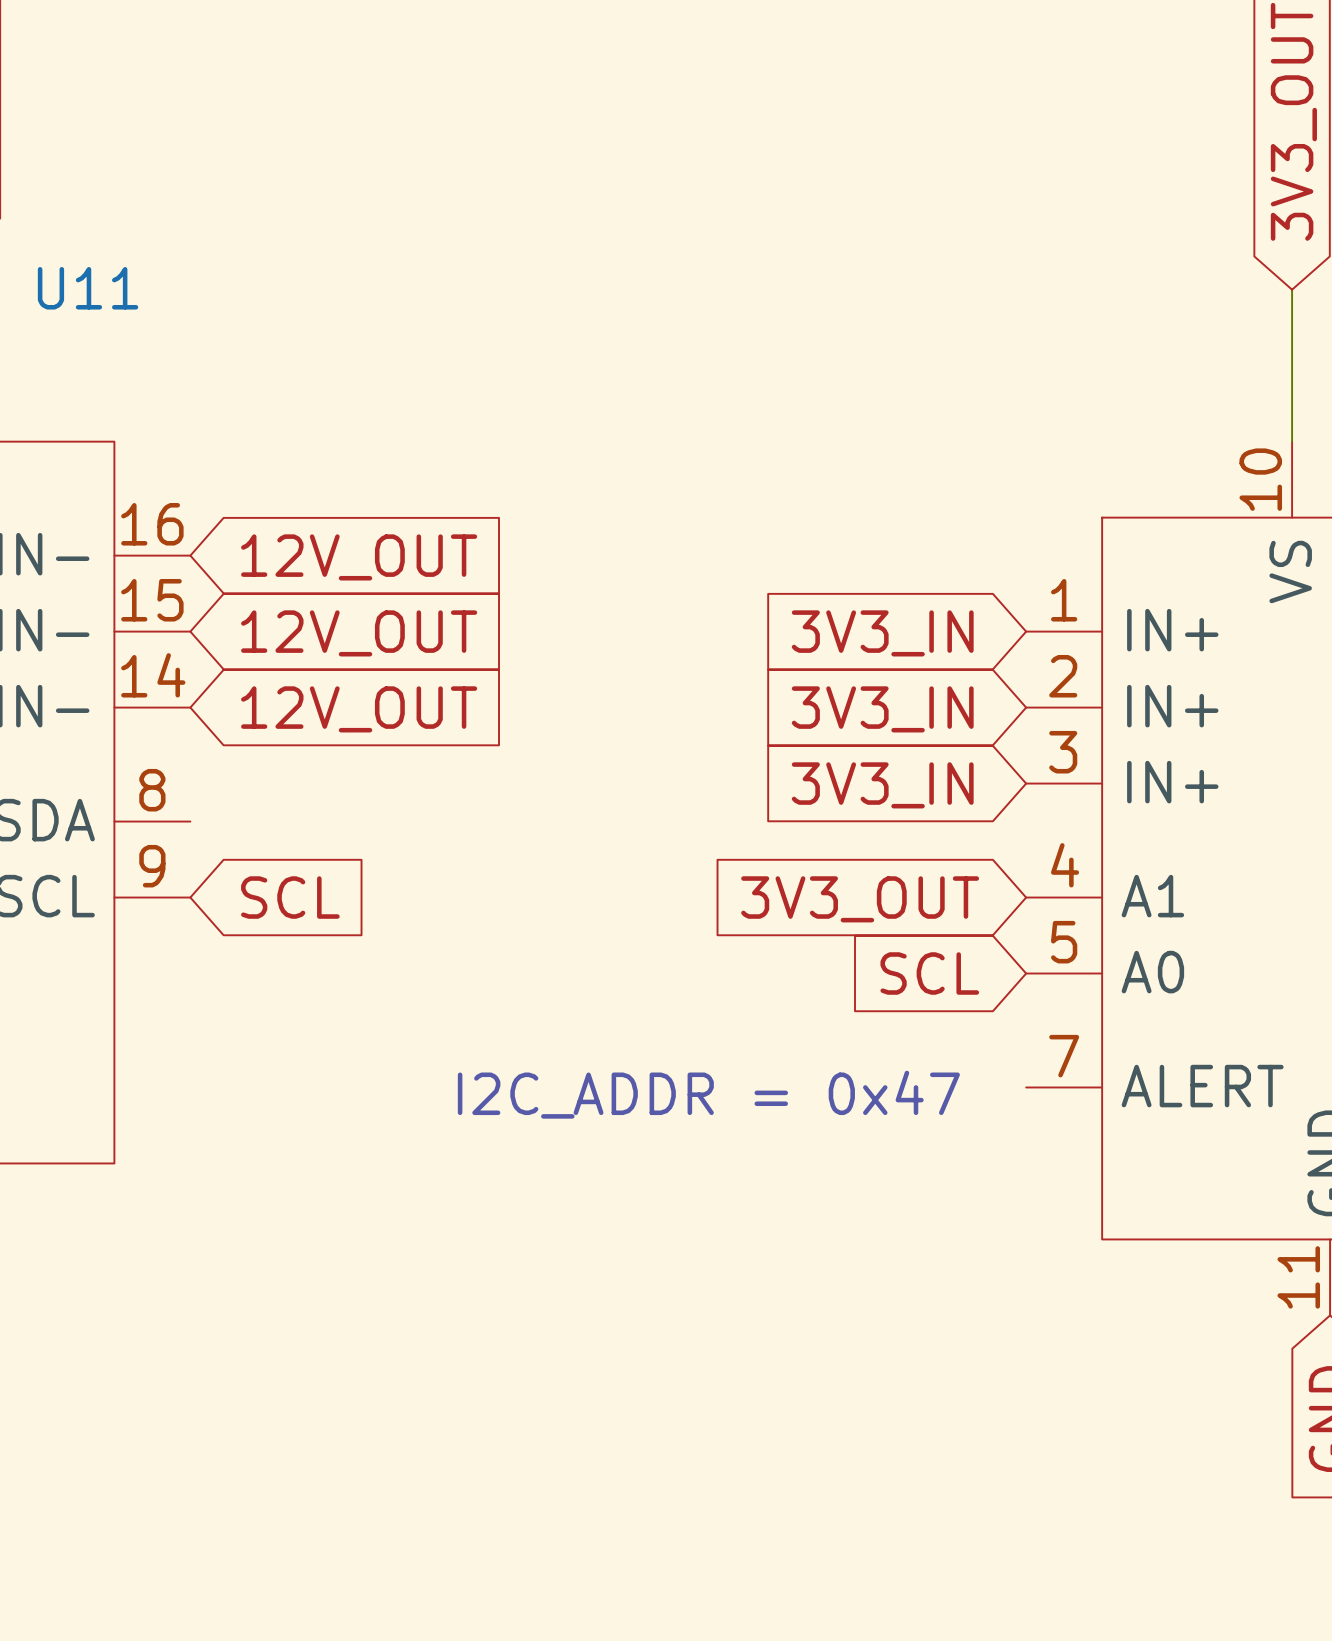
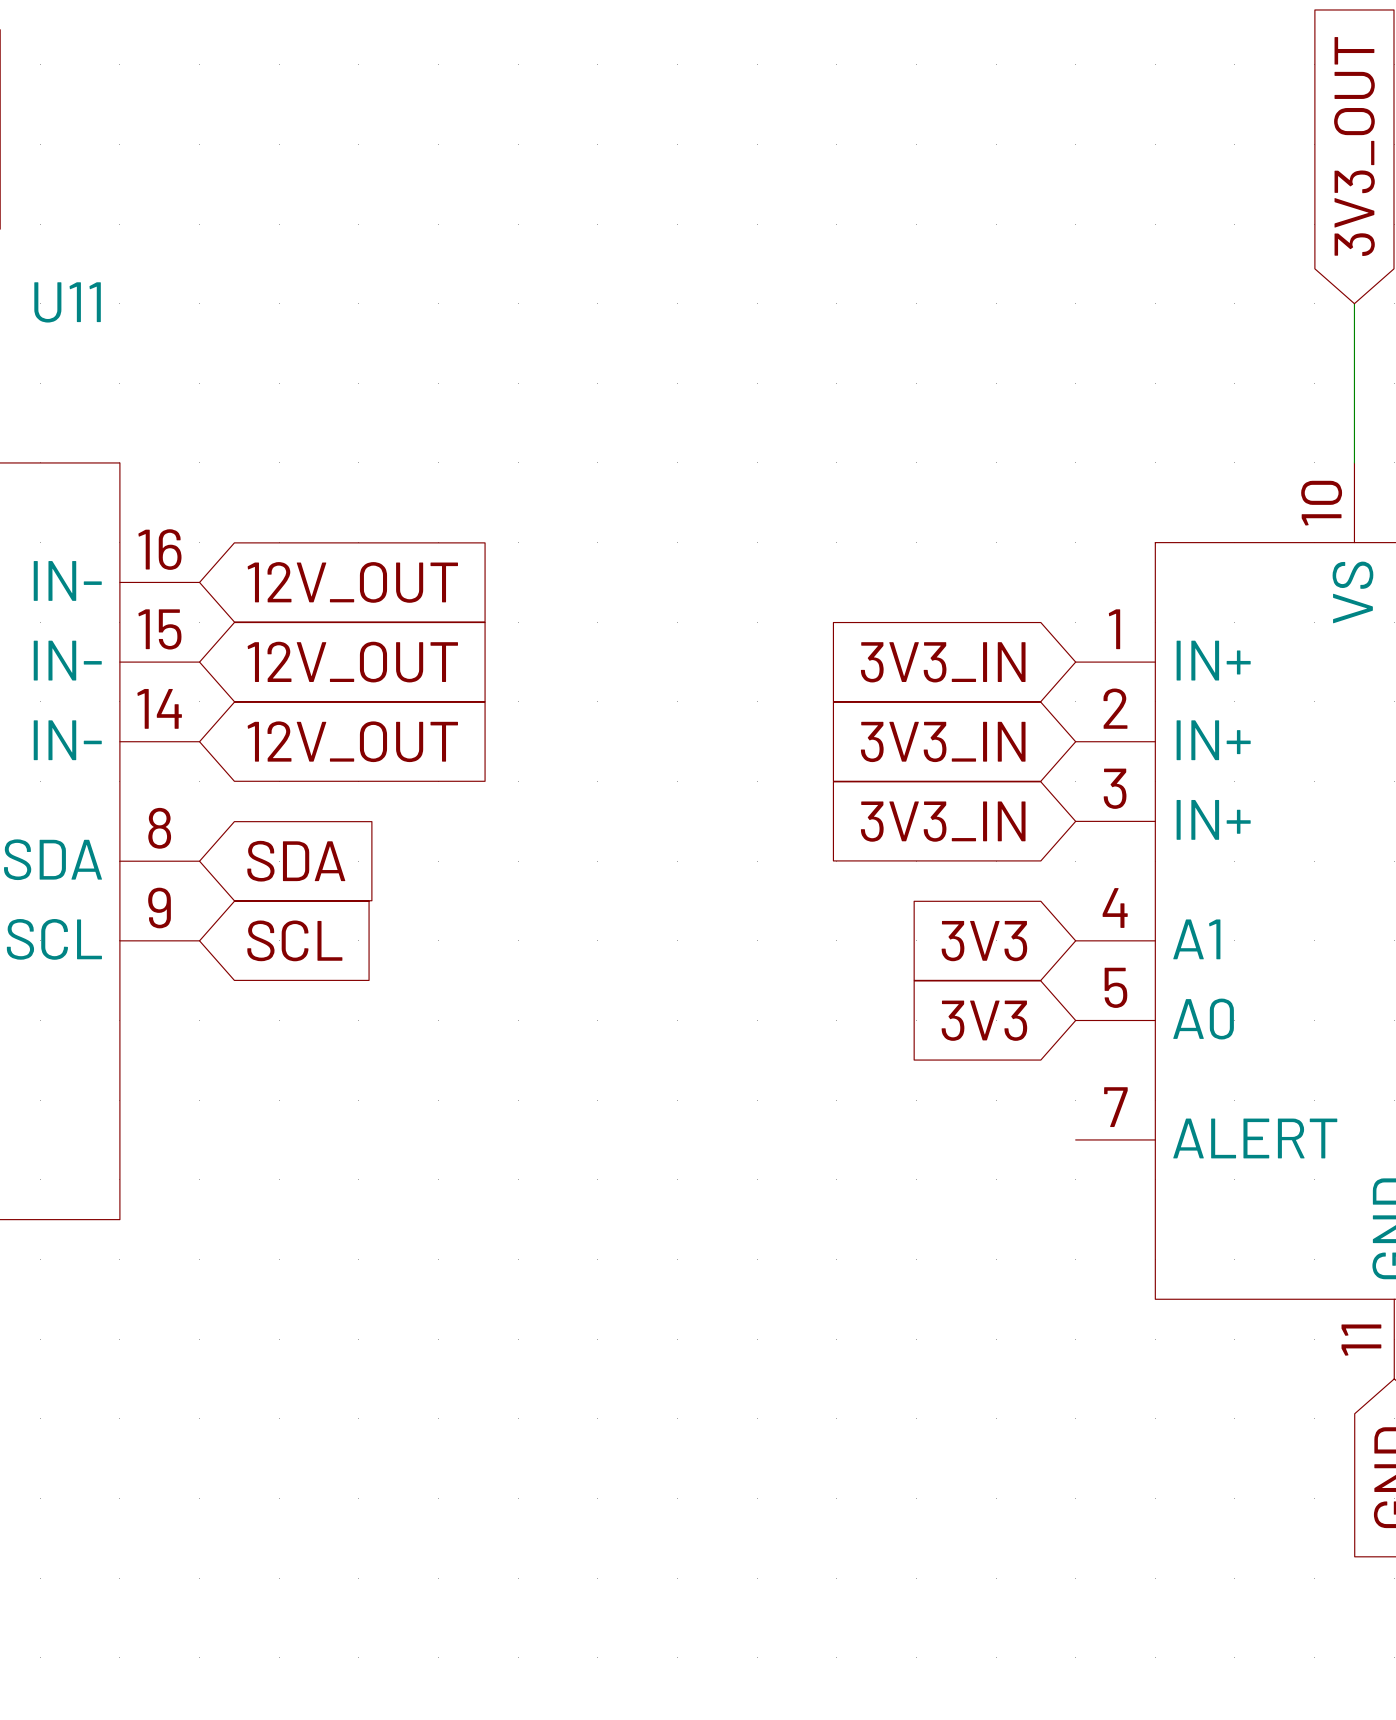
global label: none -> SDA (296, 861)
global label: 3V3_OUT (860, 899) -> 3V3 (984, 941)
global label: SCL (929, 973) -> 3V3 (984, 1020)
text: I2C_ADDR = 0x47 (708, 1094) -> none

